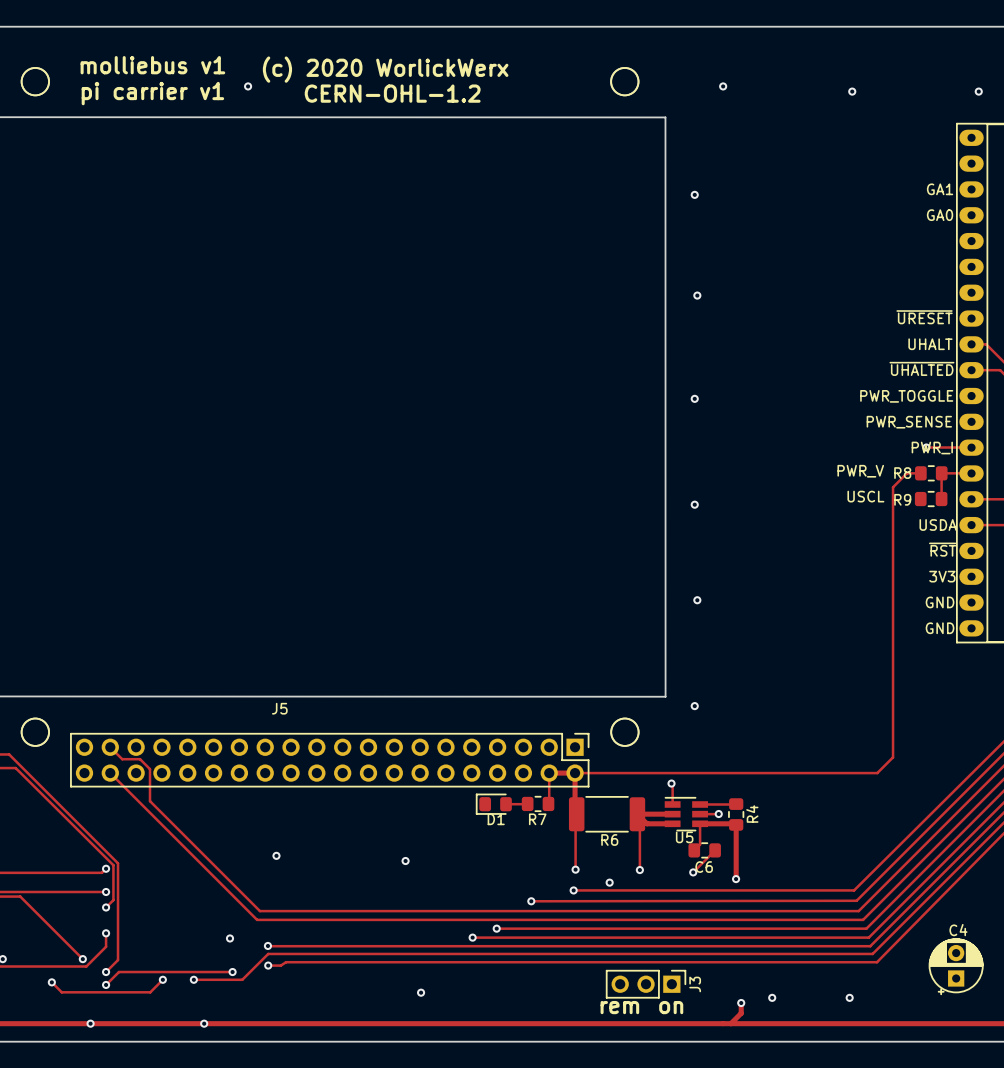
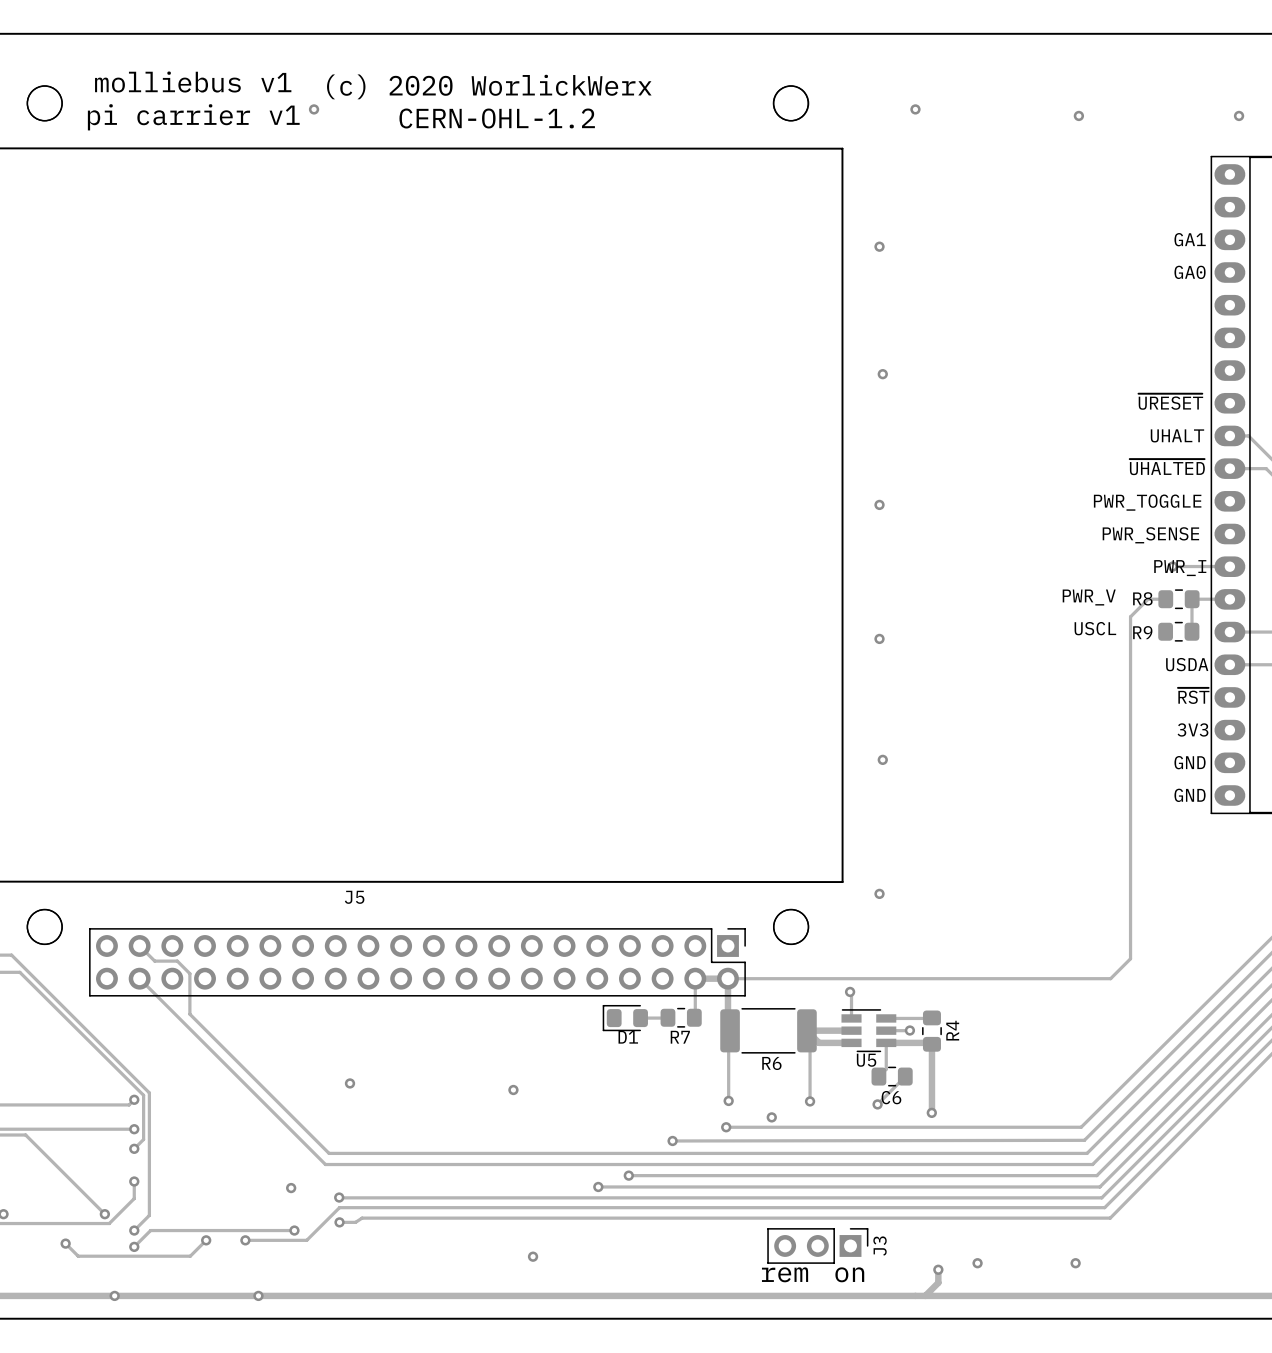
C4: (956, 966) -> none

